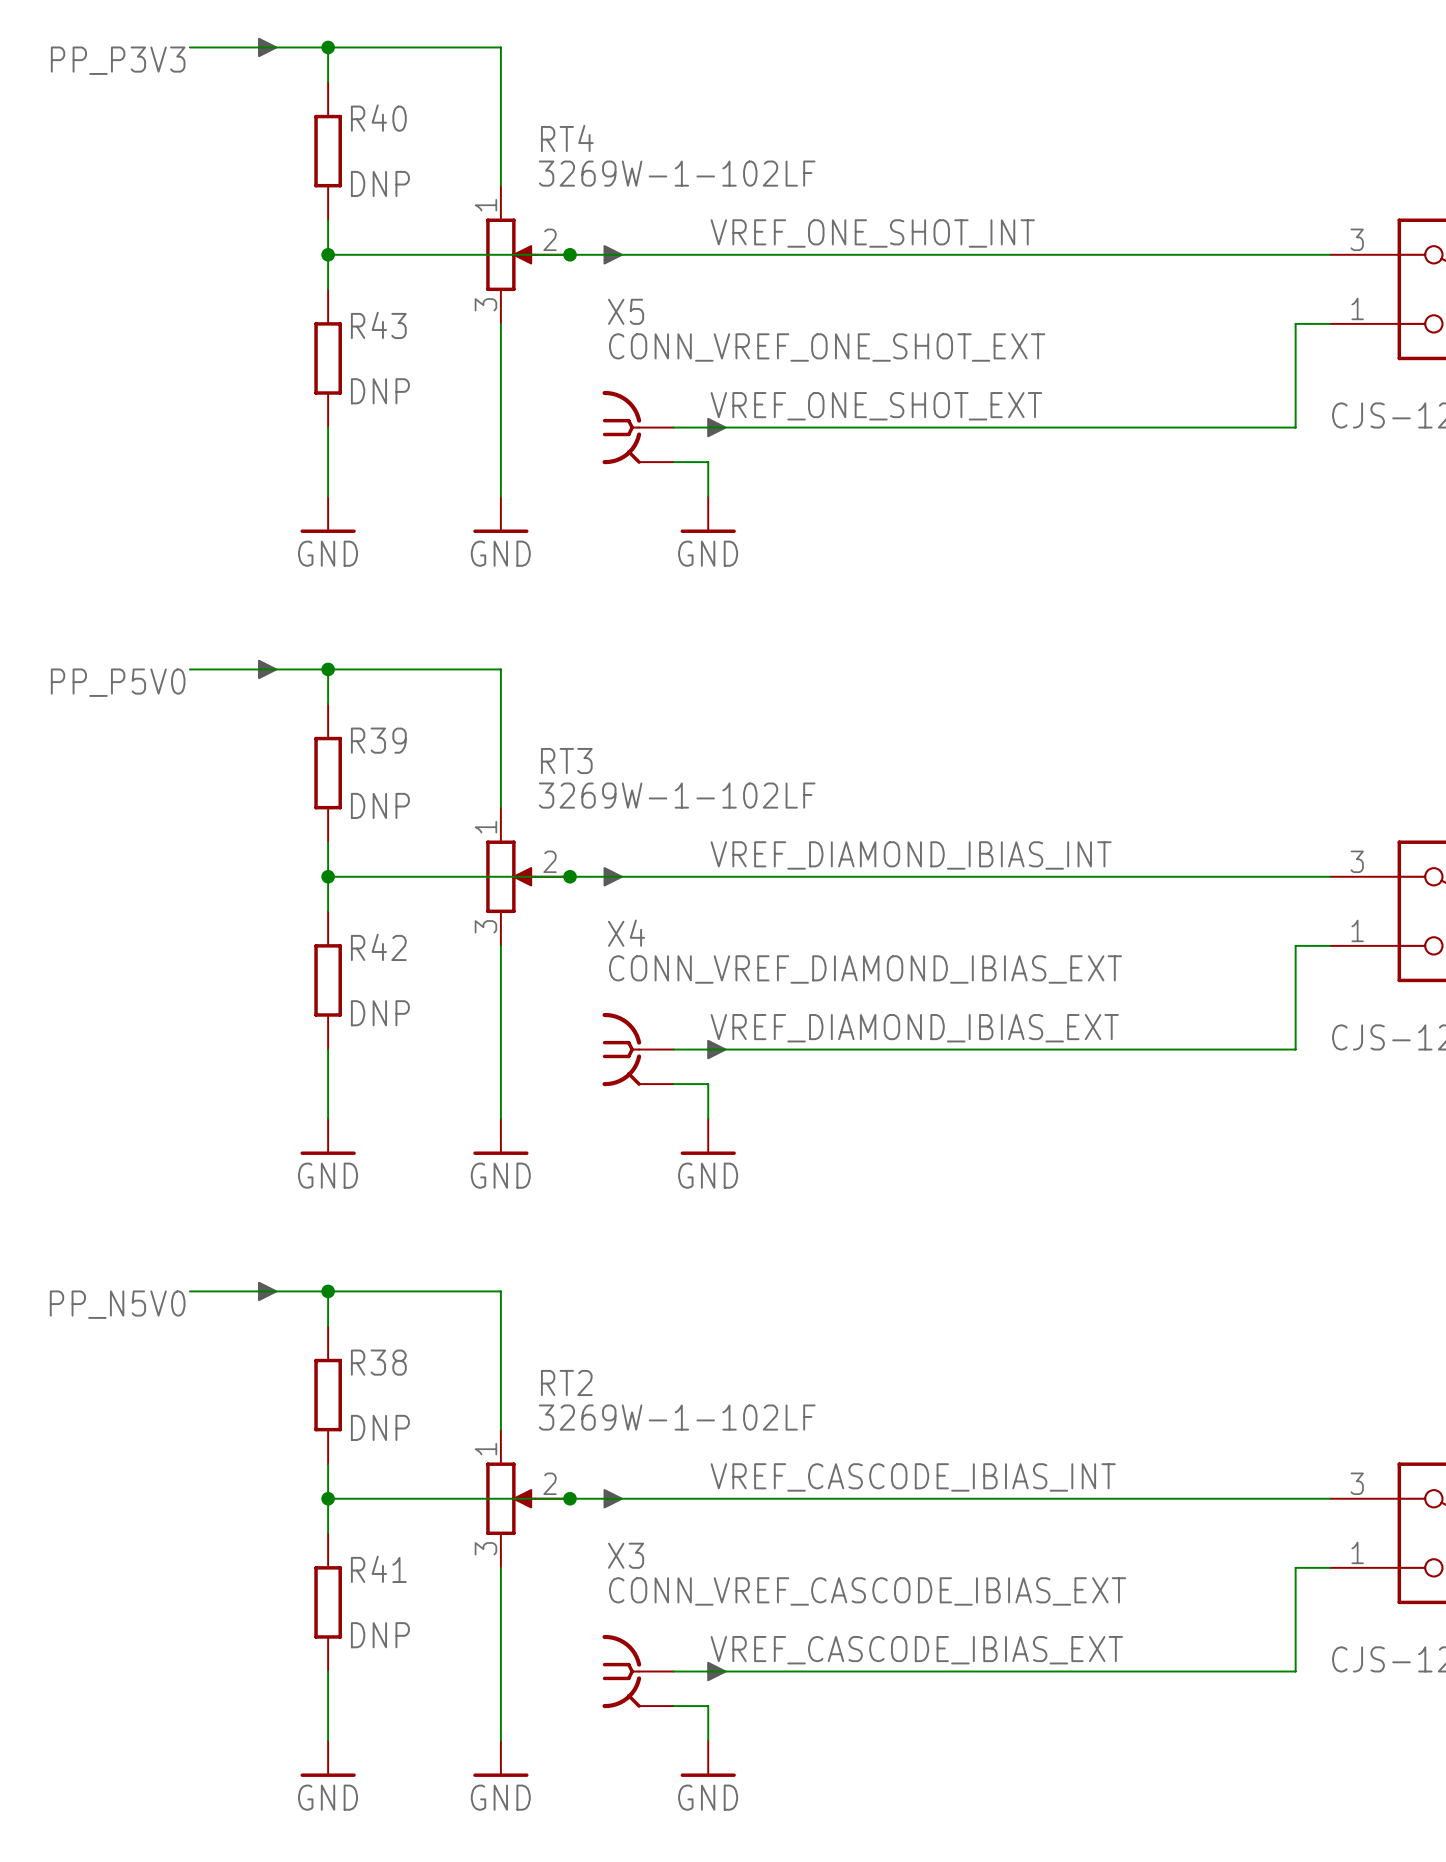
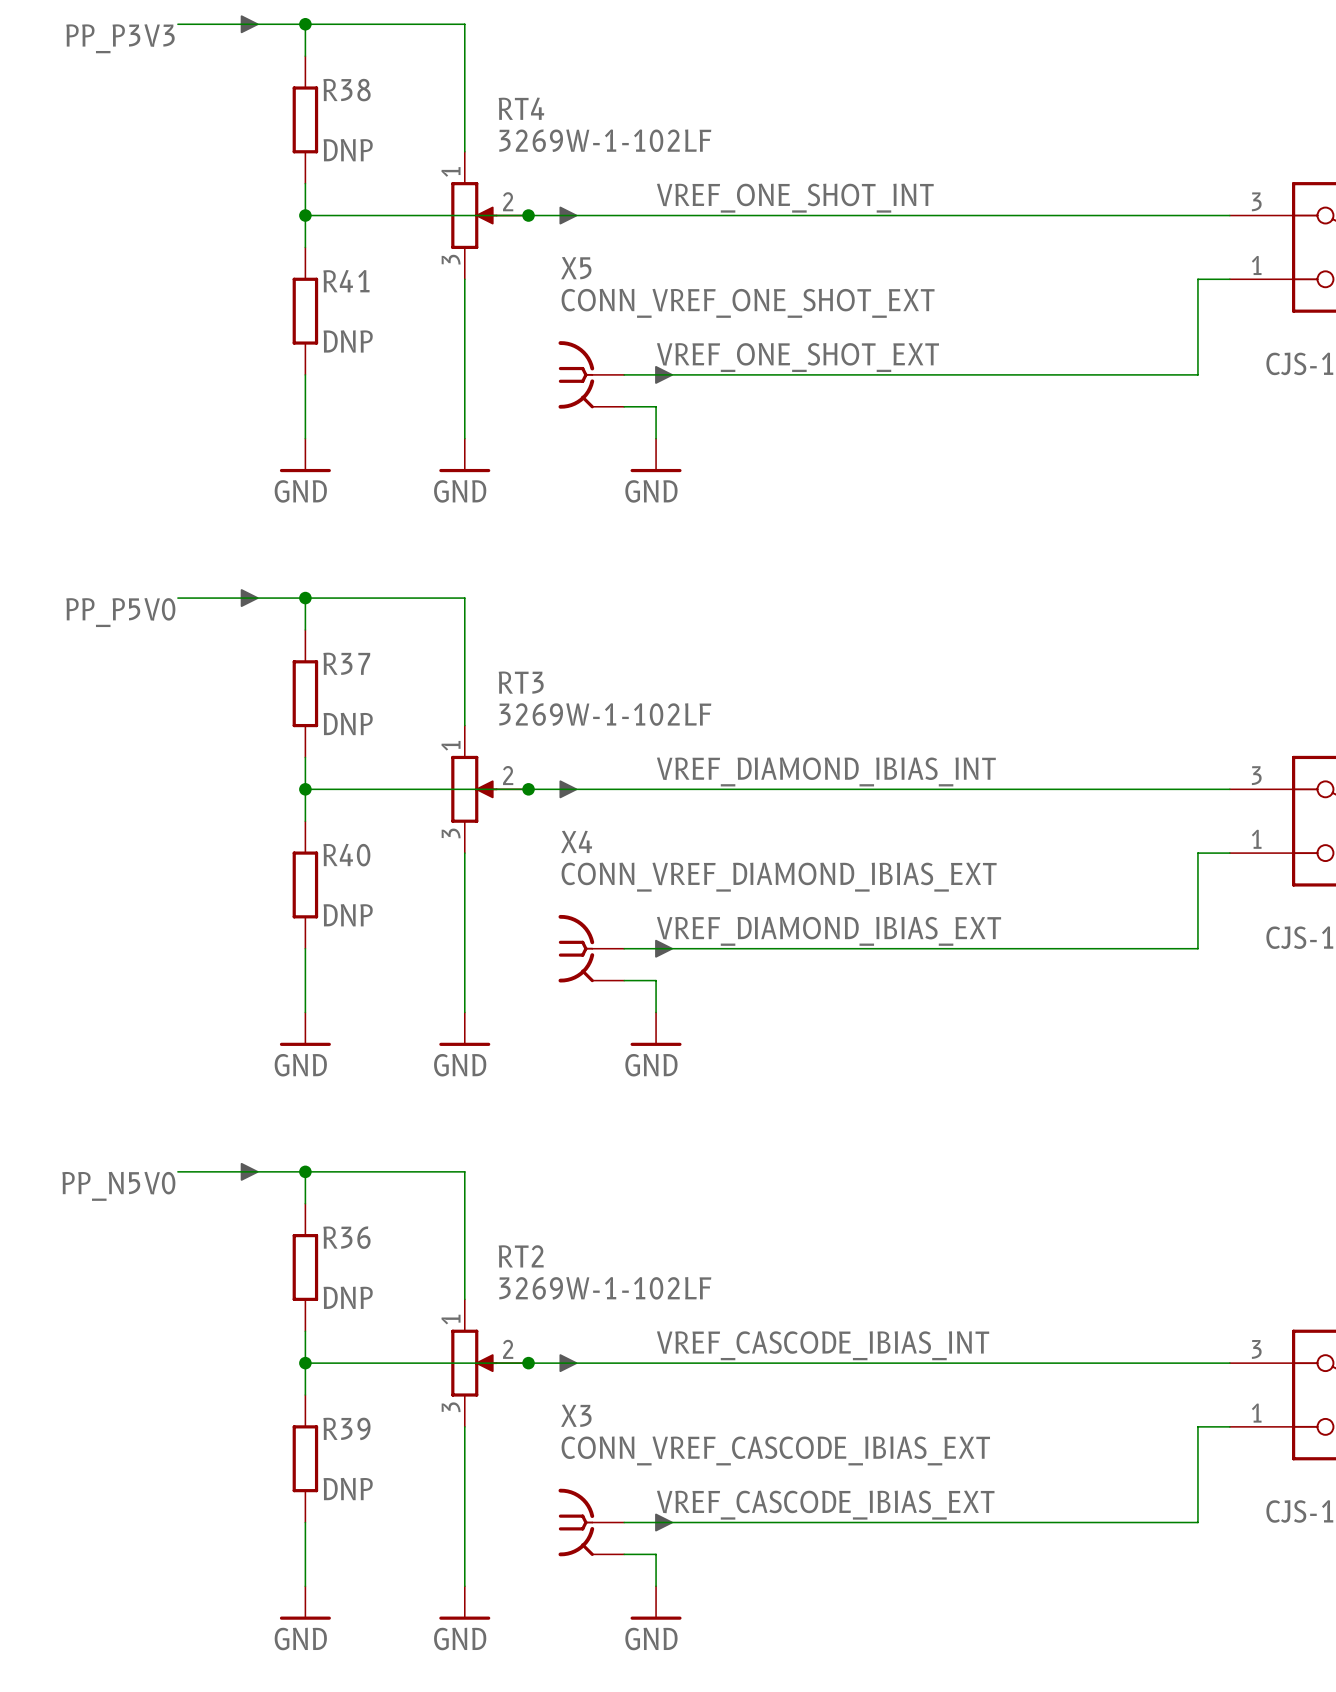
R40 name: R40 (378, 118) -> R38 (347, 90)
R43 name: R43 (378, 325) -> R41 (346, 281)
R39 name: R39 (378, 740) -> R37 (346, 663)
R42 name: R42 (378, 947) -> R40 (346, 855)
R38 name: R38 (378, 1362) -> R36 (346, 1237)
R41 name: R41 (378, 1569) -> R39 (346, 1428)

